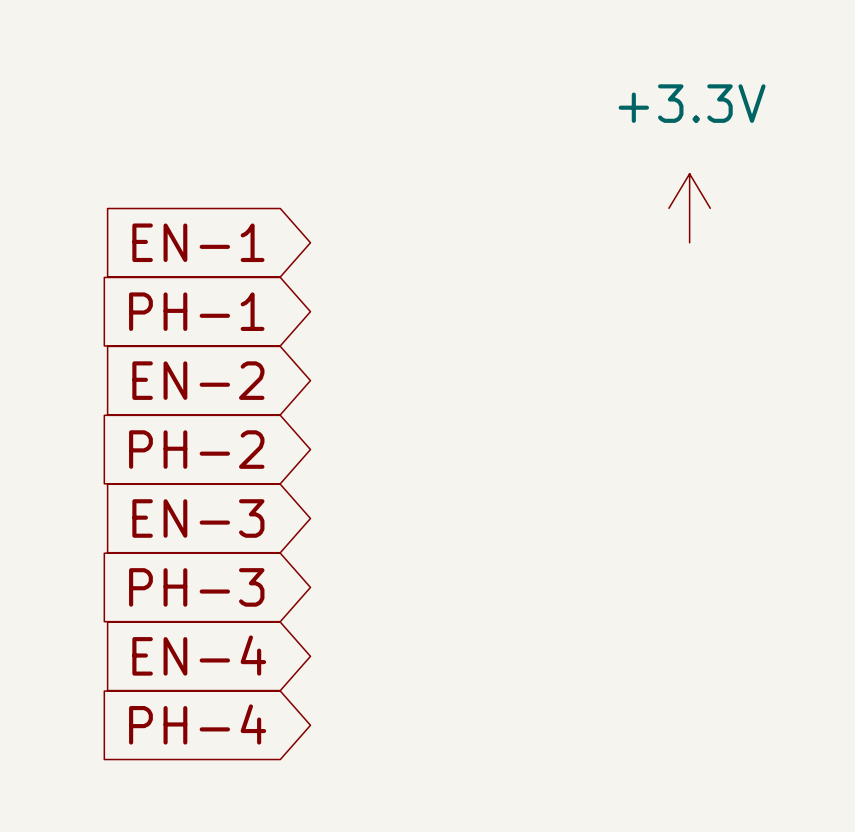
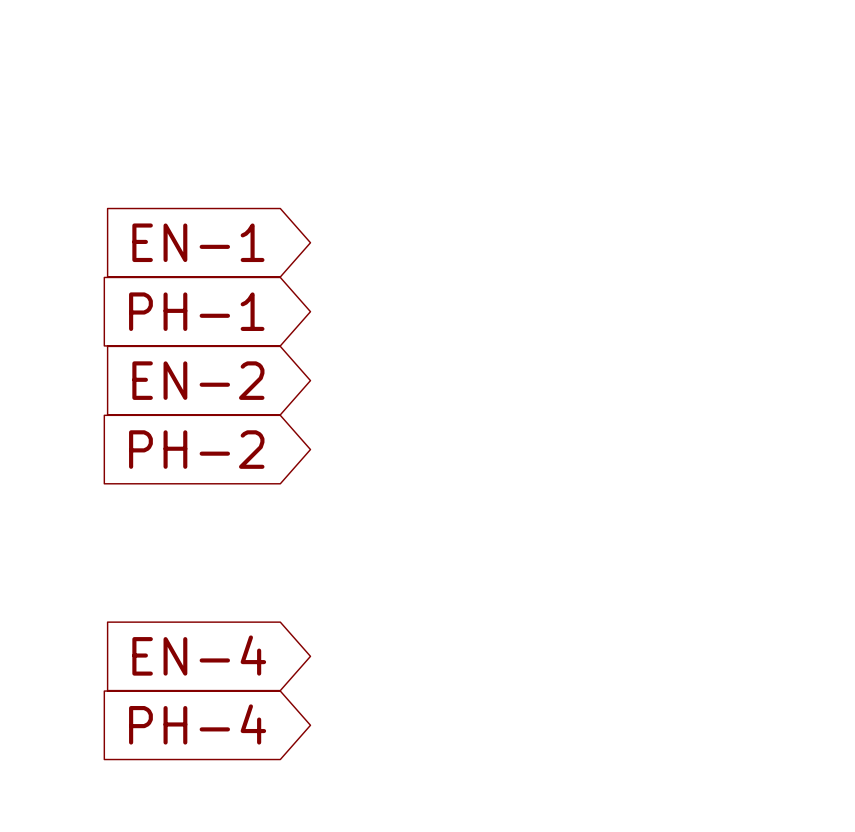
power symbol: +3.3V (689, 208) -> none
global label: EN-3 (198, 518) -> none
global label: PH-3 (196, 587) -> none

